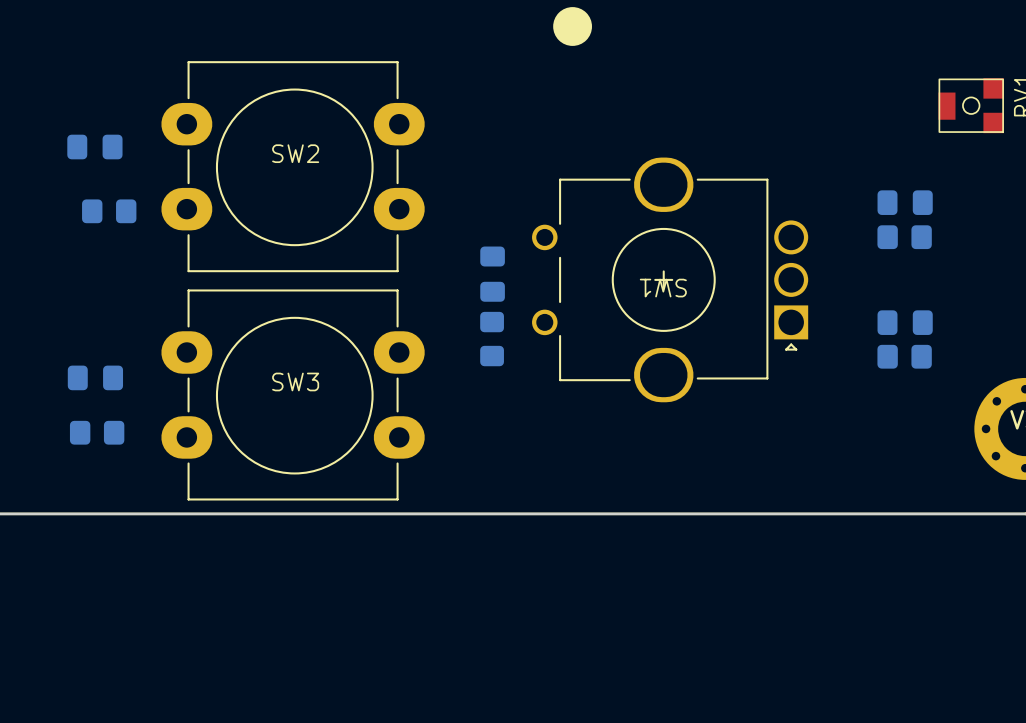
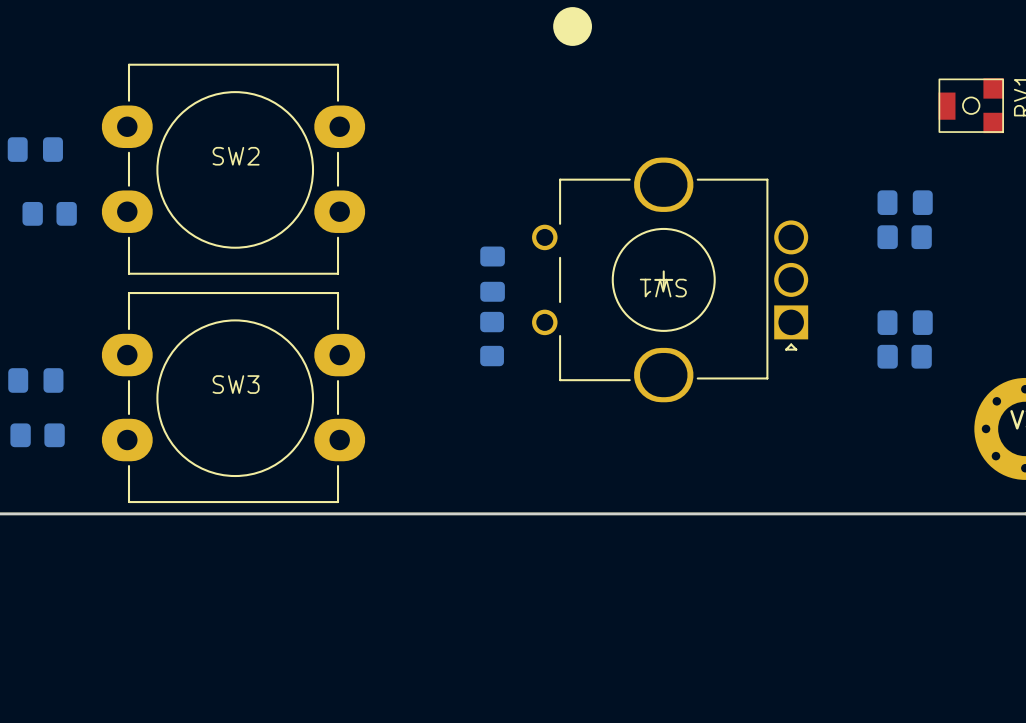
part position: (94, 147) -> (35, 149)
SW2 position: (293, 166) -> (233, 169)
part position: (109, 211) -> (49, 213)
part position: (95, 377) -> (35, 380)
SW3 position: (293, 394) -> (233, 397)
part position: (97, 432) -> (37, 435)

